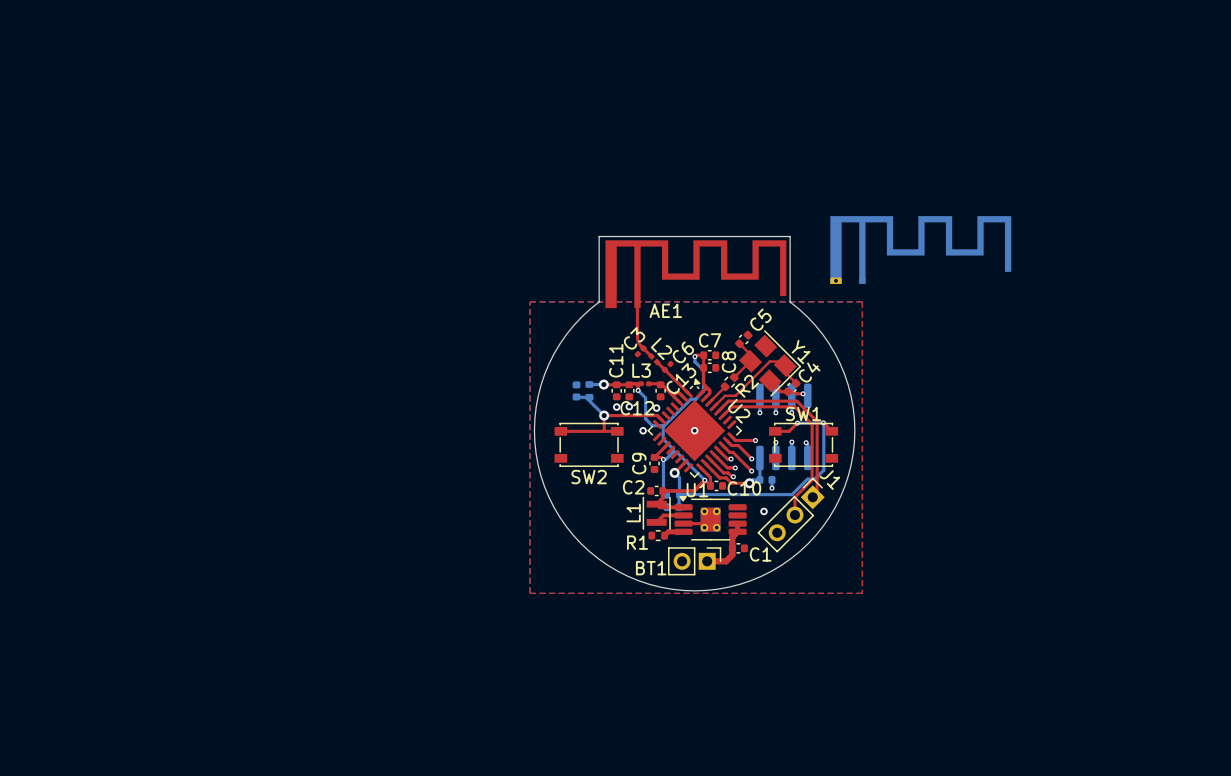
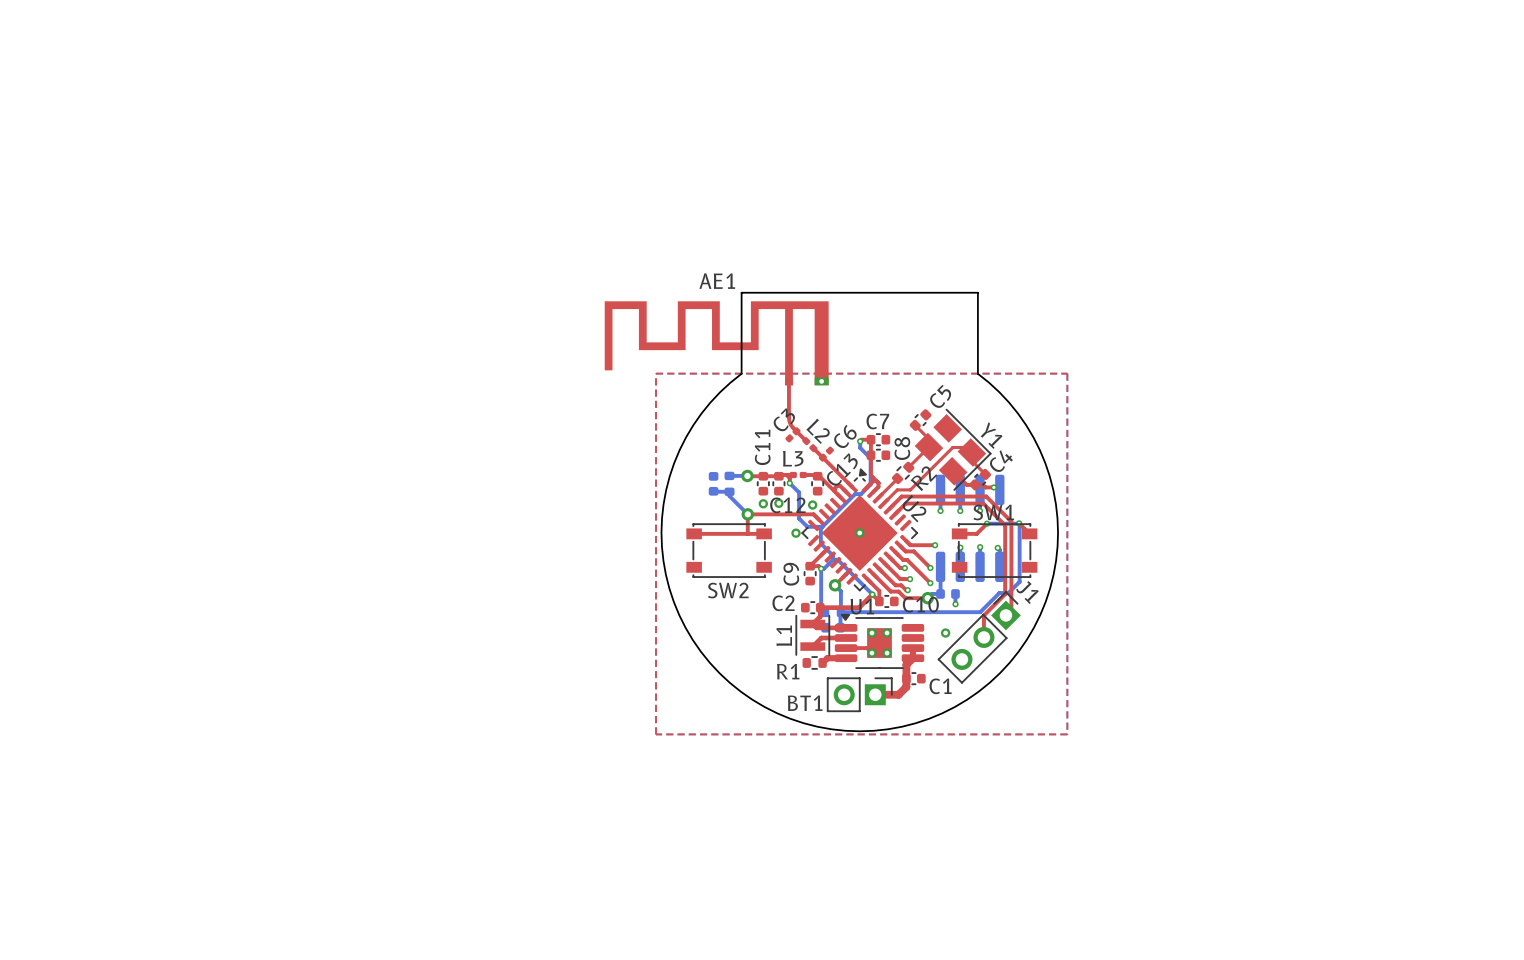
AE1 footprint: [605, 240, 787, 309] -> [604, 301, 829, 386]
part: (920, 250) -> none
AE1 name position: AE1 (665, 310) -> AE1 (717, 281)

